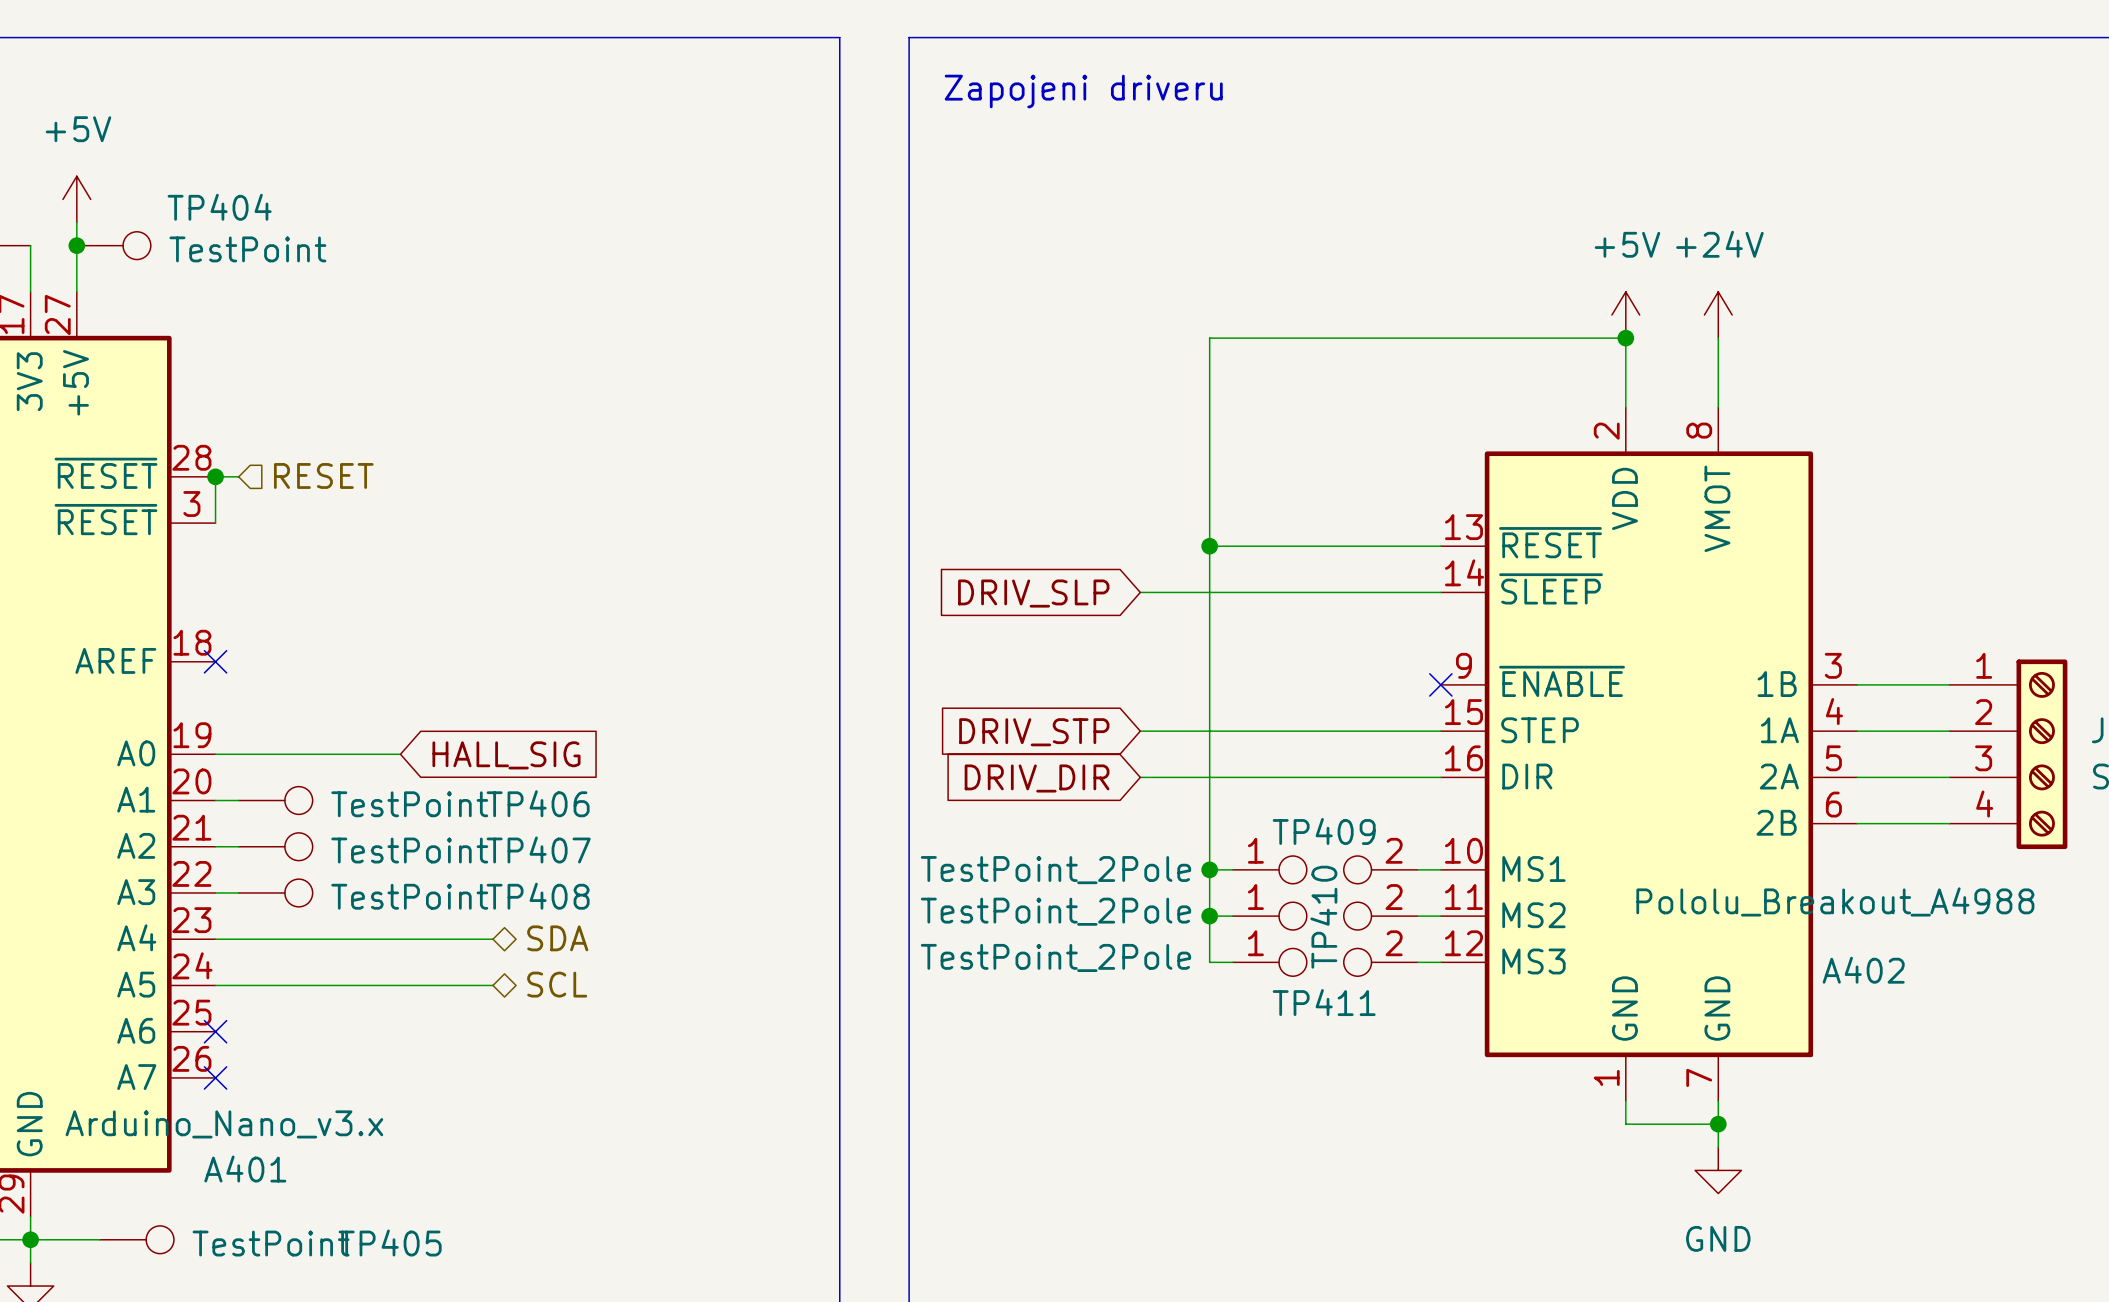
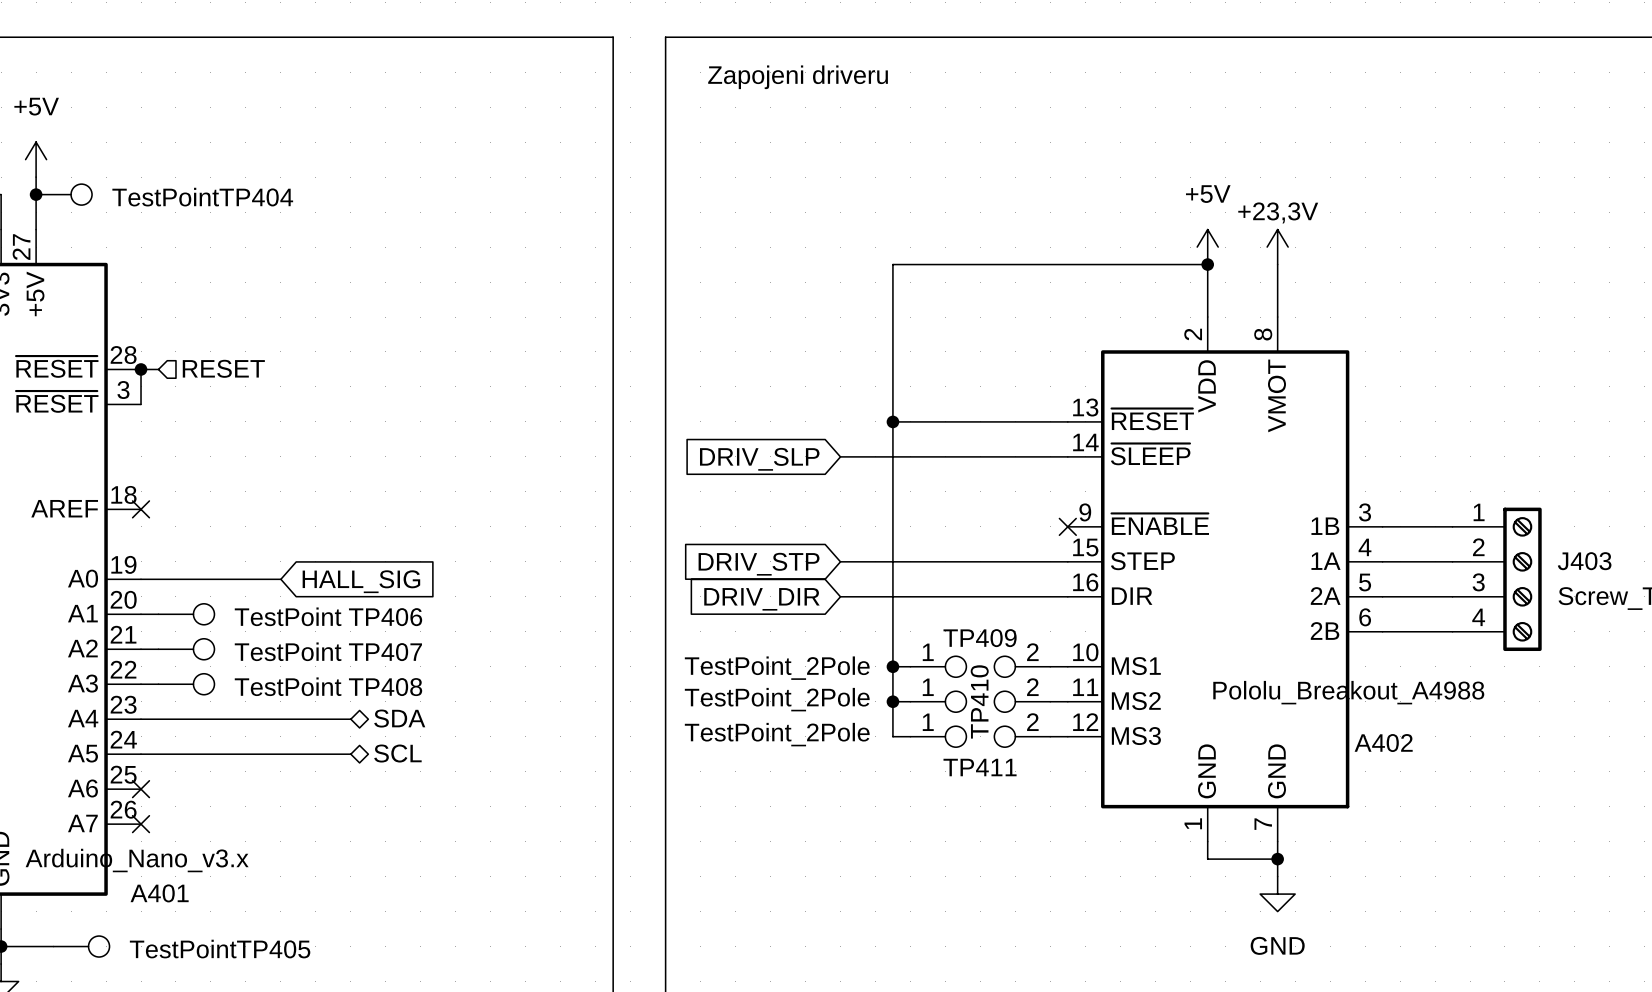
TP404 name position: TP404 (219, 207) -> TP404 (256, 197)
power symbol: +24V (1718, 315) -> +23,3V (1277, 247)

